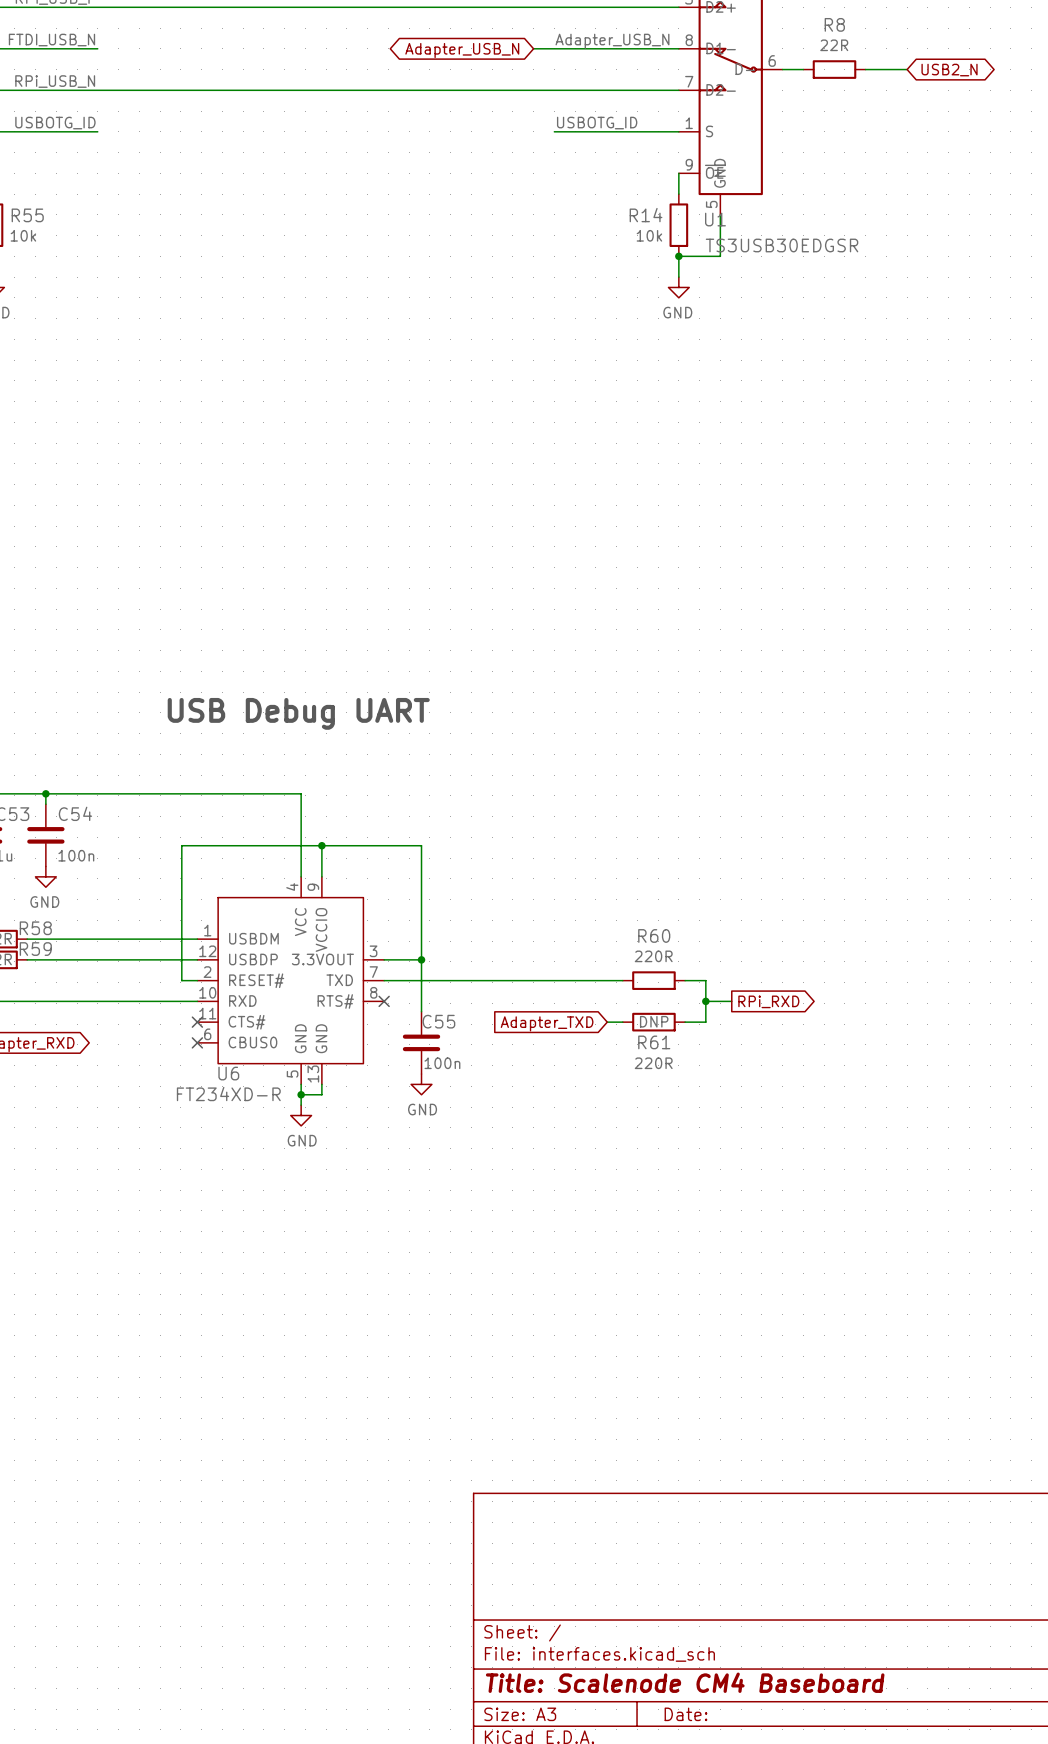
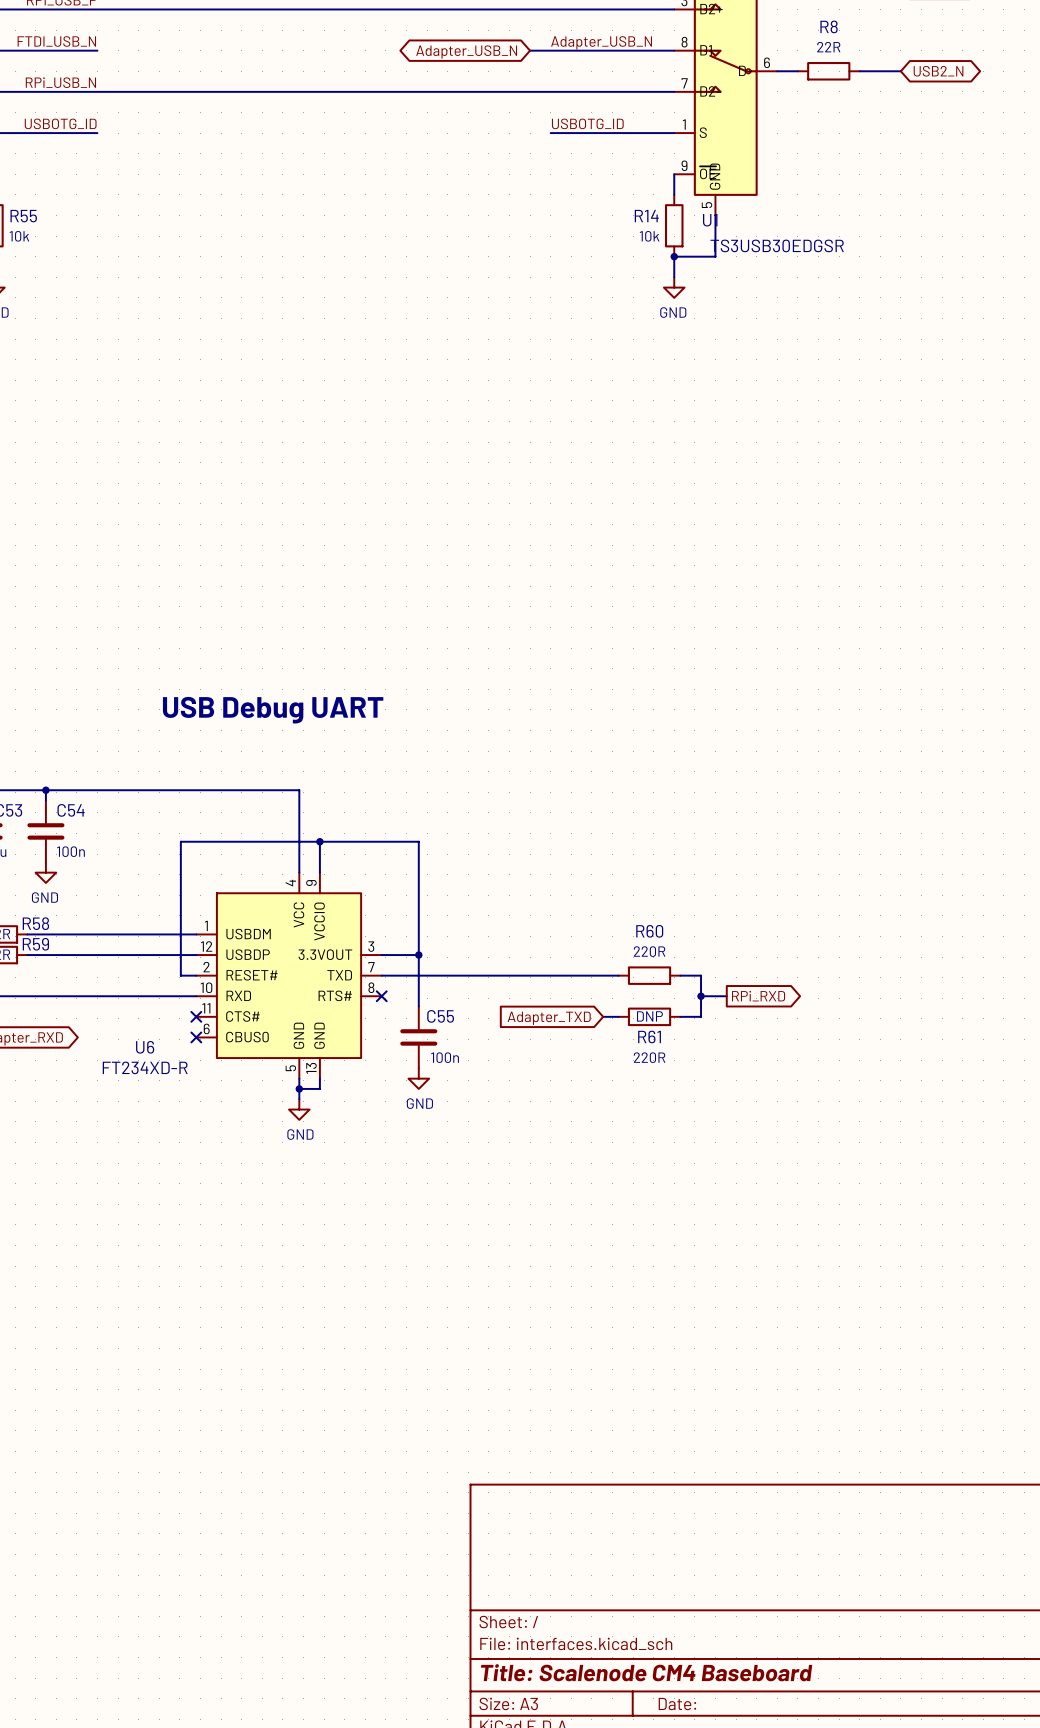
U6 name position: U6 (228, 1073) -> U6 (145, 1047)
U6 value position: FT234XD-R (228, 1094) -> FT234XD-R (145, 1067)

